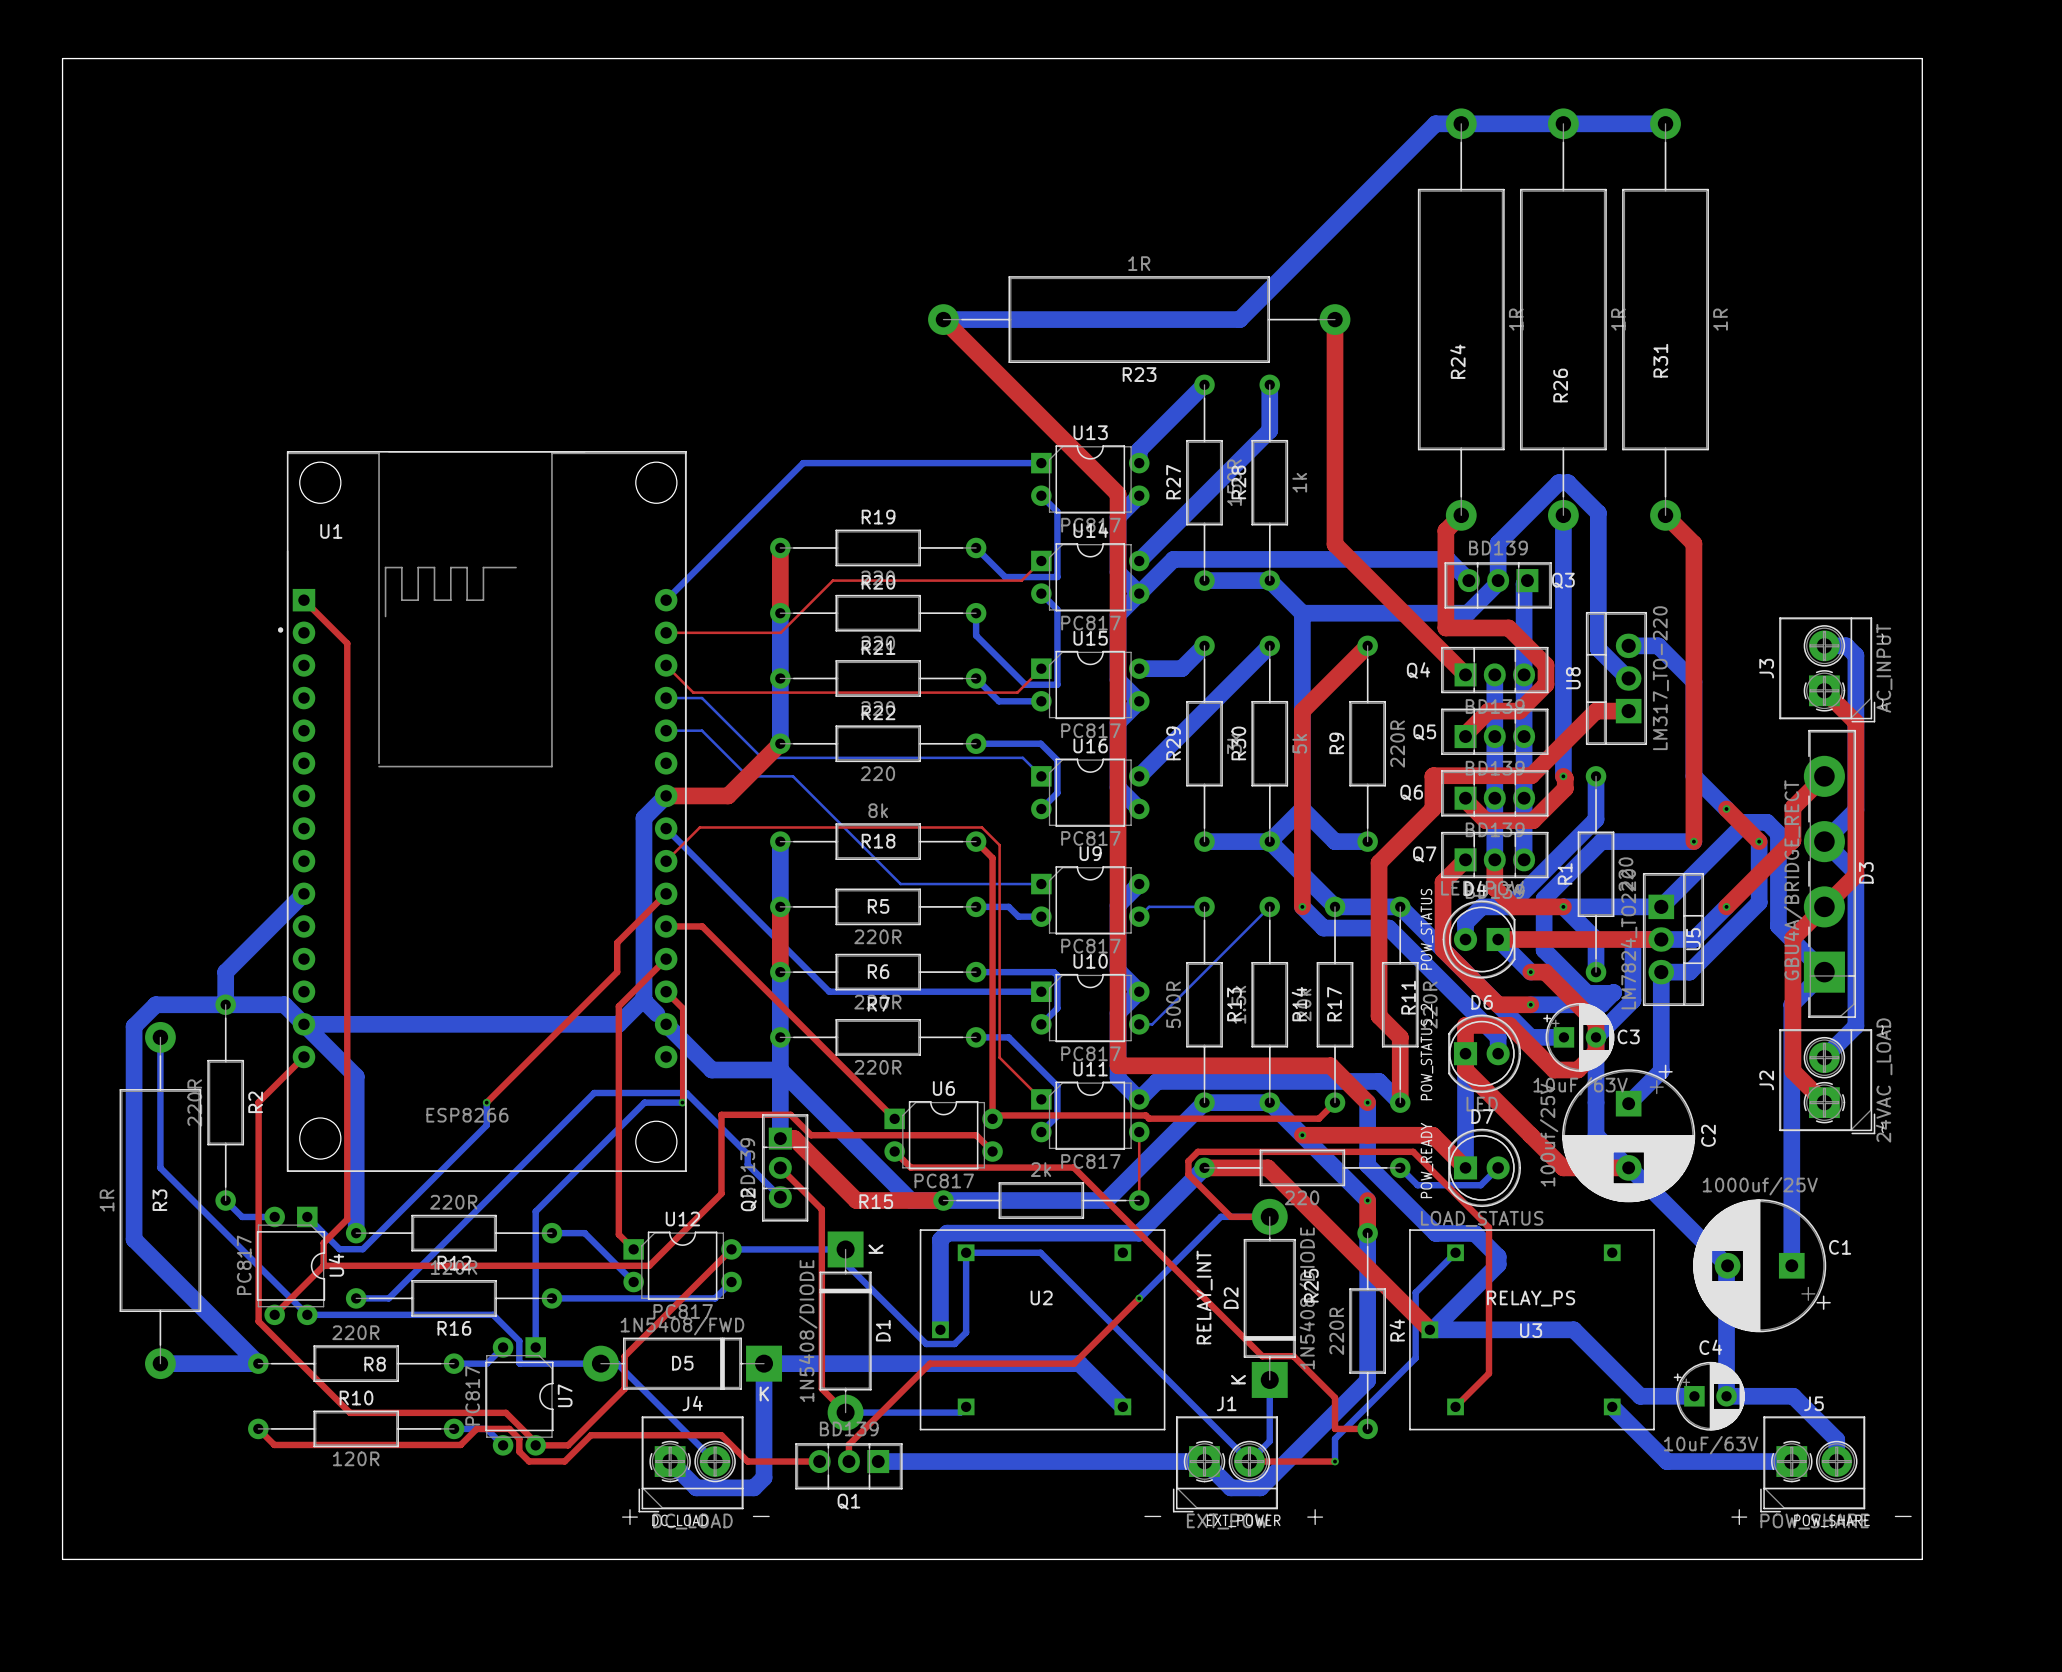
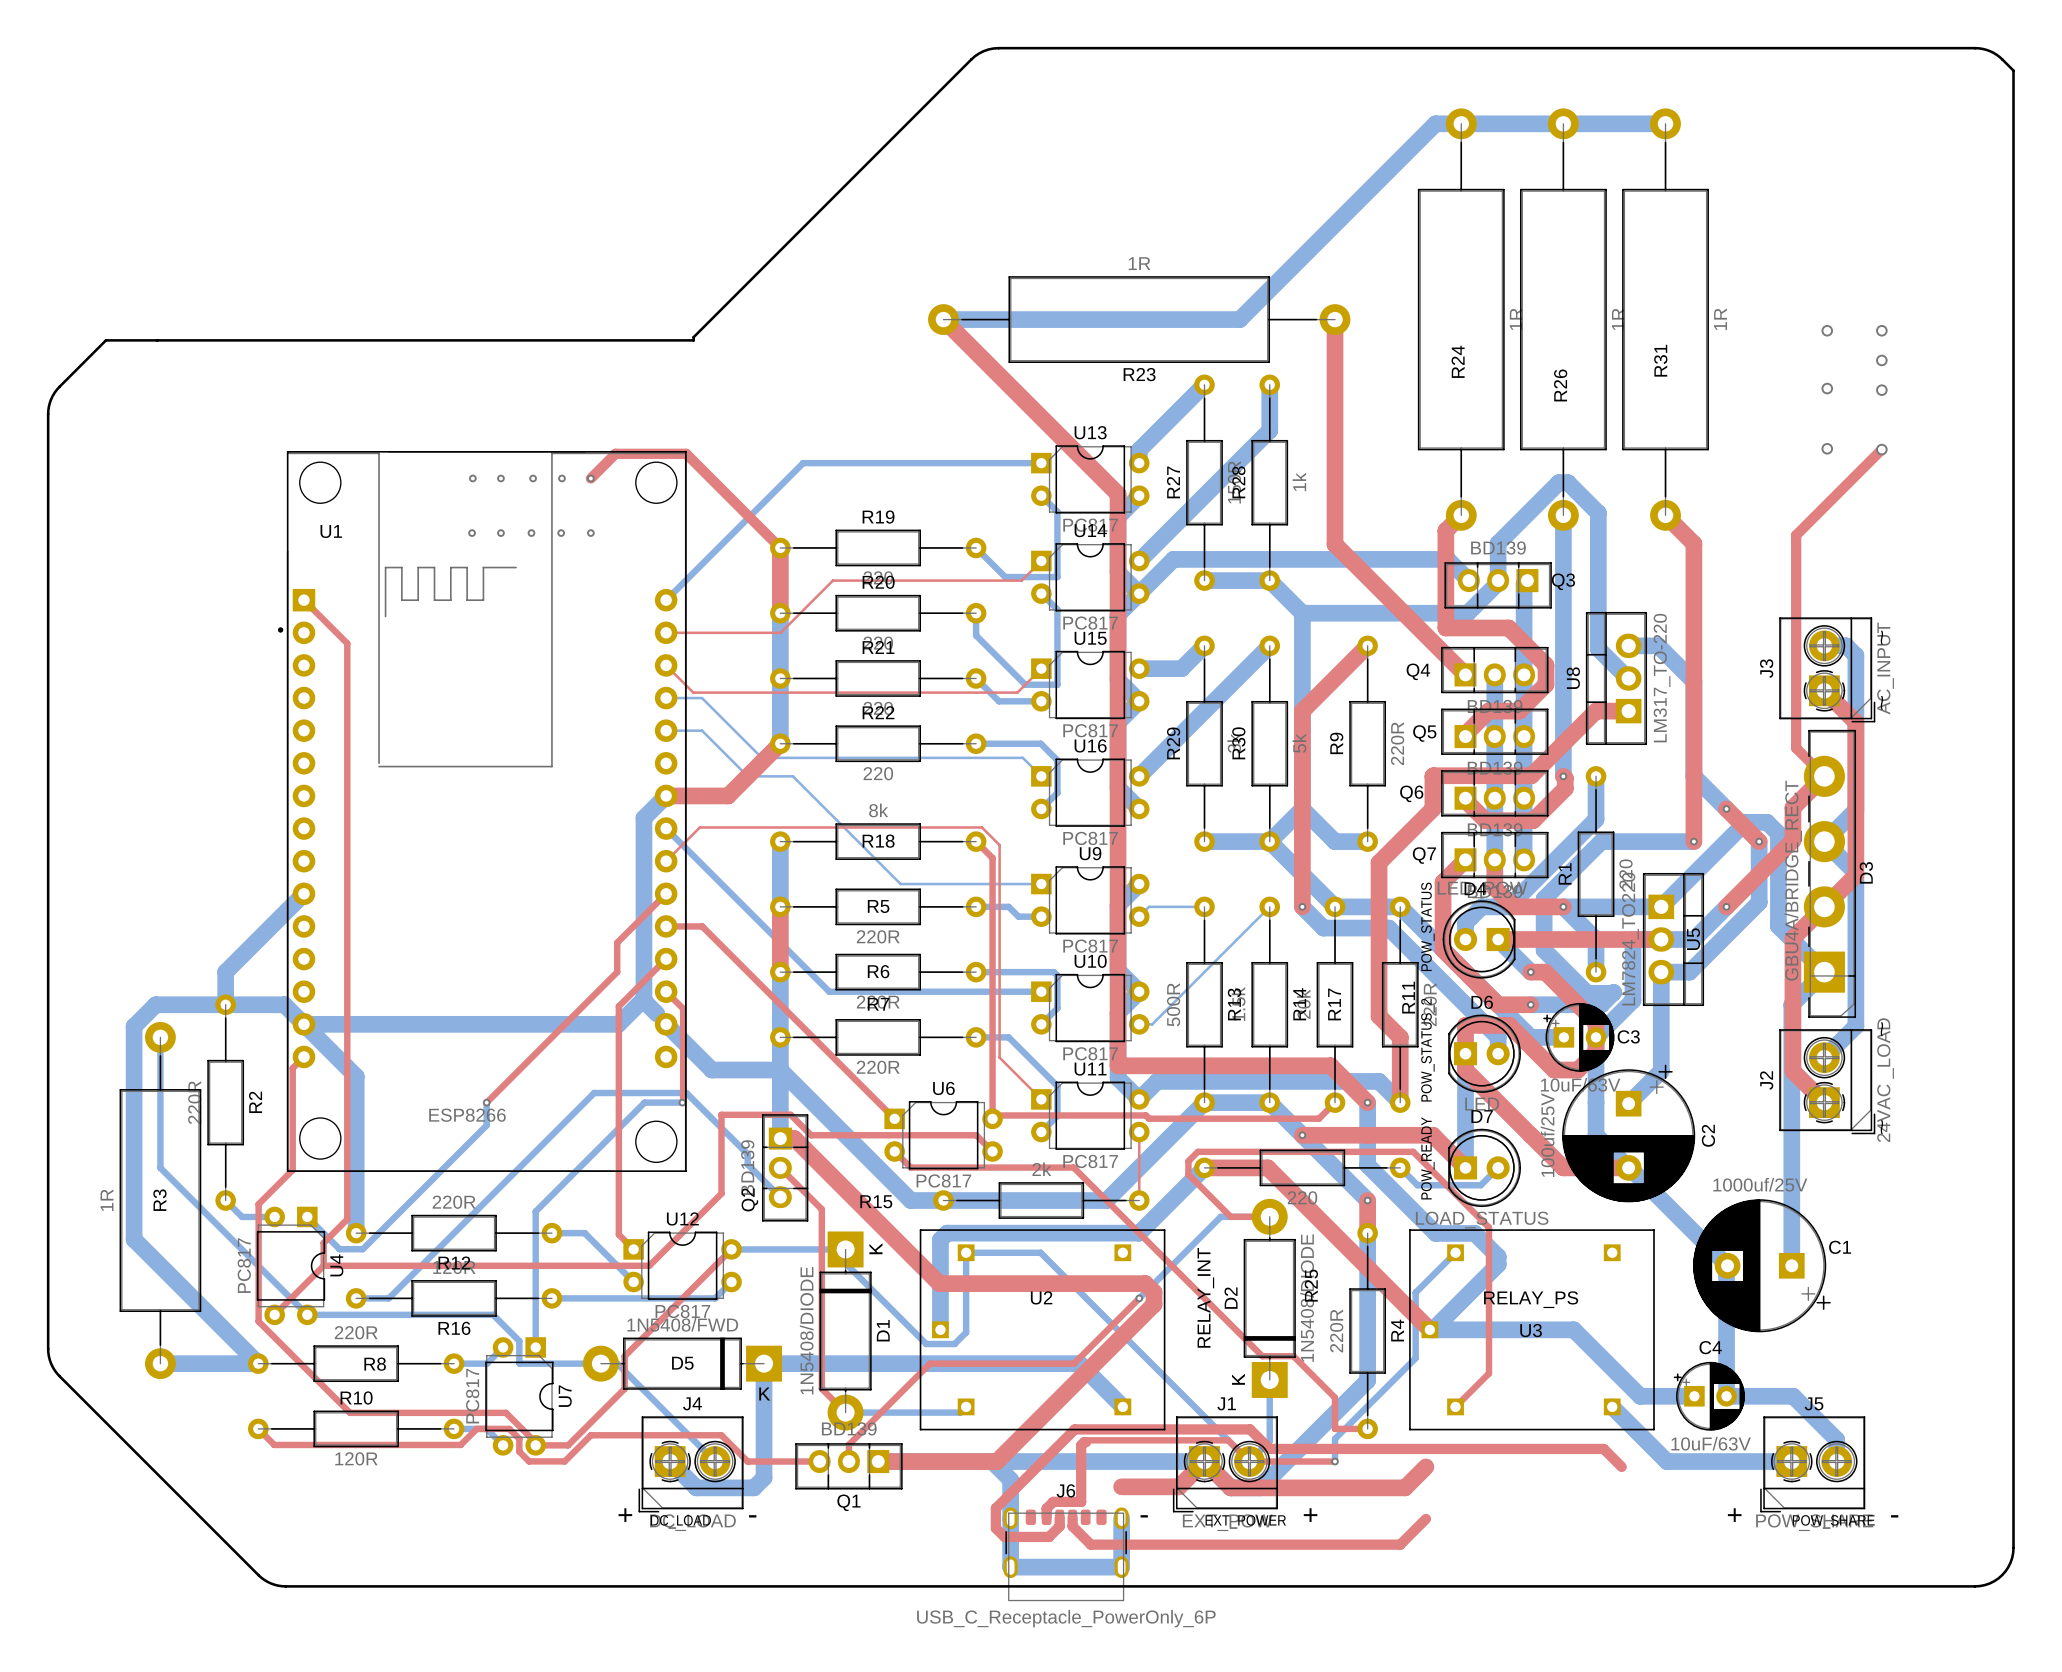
board edge: (62, 58) (1922, 58) (1922, 1559) (62, 1559) (62, 58) -> (998, 48) (983, 51) (971, 59) (693, 337) (693, 340) (105, 340) (54, 392) (49, 402) (48, 414) (48, 1348) (49, 1360) (54, 1370) (258, 1575) (270, 1583) (281, 1586) (1974, 1586) (1994, 1581) (2008, 1567) (2013, 1547) (2013, 70) (1993, 52) (1975, 48) (998, 48)
via: none -> (1827, 330)
via: none -> (1881, 330)
via: none -> (1881, 360)
via: none -> (1827, 388)
via: none -> (1881, 390)
via: none -> (1827, 448)
top track: none -> (1881, 449) (1796, 535) (1796, 748) (1824, 776)
via: none -> (1881, 449)
via: none -> (472, 478)
via: none -> (500, 478)
via: none -> (533, 478)
via: none -> (561, 478)
top track: none -> (590, 478) (615, 453) (686, 453) (780, 547)
via: none -> (590, 478)
via: none -> (472, 533)
via: none -> (500, 533)
via: none -> (531, 533)
via: none -> (561, 533)
via: none -> (590, 533)
top track: (292, 1068) (258, 1102) (258, 1204) -> (292, 1068) (292, 1170) (258, 1204)
top track: (856, 1200) (943, 1200) -> (856, 1200) (939, 1283) (1145, 1283) (1154, 1292) (1154, 1304) (997, 1461) (878, 1461)
top track: none -> (1086, 1440) (1228, 1440) (1249, 1461)
top track: none -> (1086, 1442) (1081, 1445) (1081, 1501) (1053, 1501) (1046, 1508) (1046, 1517)
bottom track: none -> (992, 1461) (1010, 1479) (1010, 1567) (1121, 1567) (1121, 1518)
top track: none -> (1425, 1466) (1405, 1487) (1230, 1487) (1204, 1461) (1179, 1486) (1121, 1486)
top track: none -> (1621, 1466) (1603, 1448) (1269, 1448) (1250, 1429) (1074, 1429) (995, 1508) (995, 1528) (1004, 1536) (1049, 1536) (1059, 1526) (1059, 1517)
top track: none -> (1072, 1517) (1072, 1526) (1090, 1544) (1400, 1544) (1425, 1518)
J6: none -> USB_C_Receptacle_PowerOnly_6P (1066, 1554)

